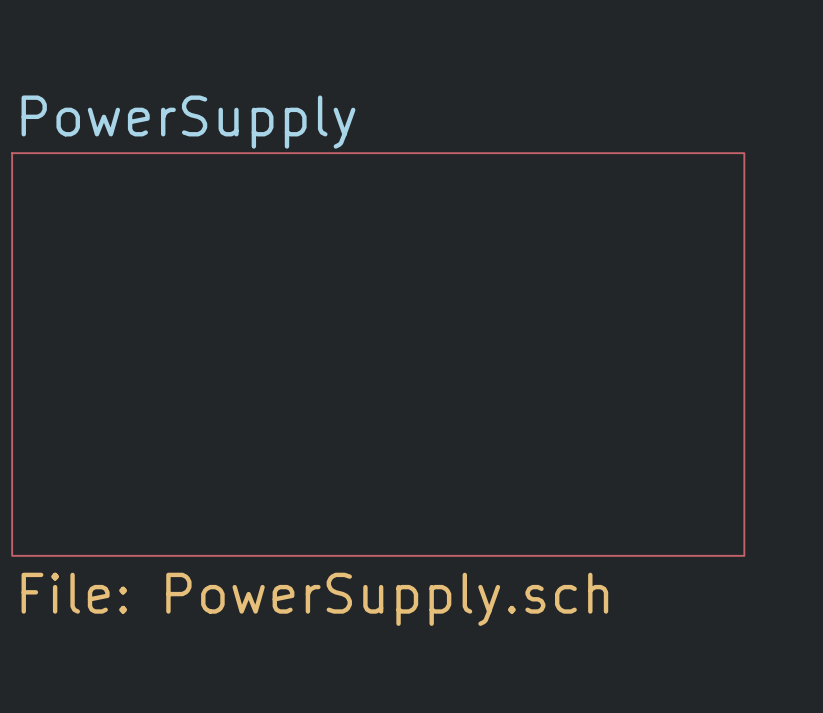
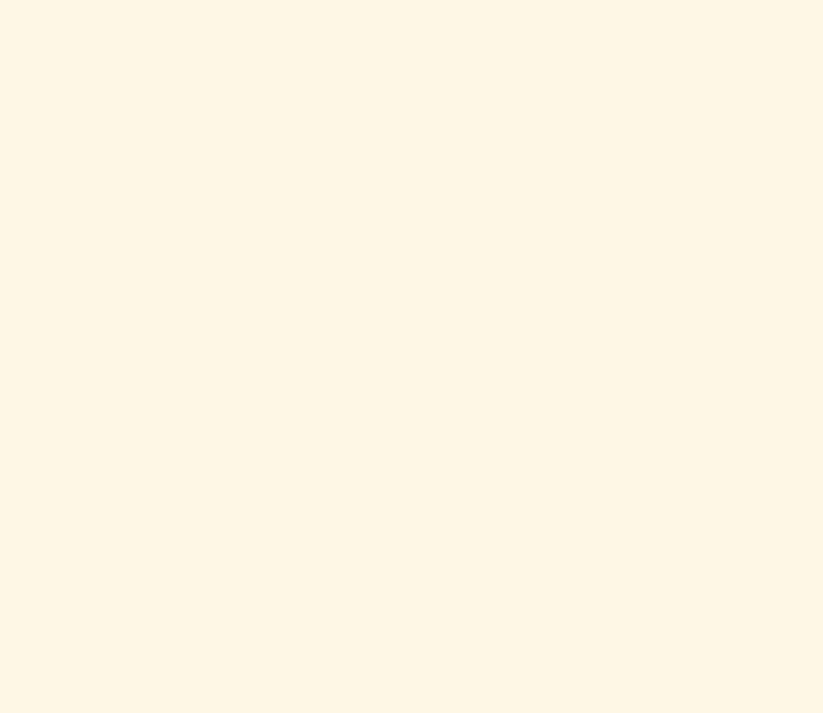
sheet PowerSupply: File: PowerSupply.sch (378, 354) -> none

